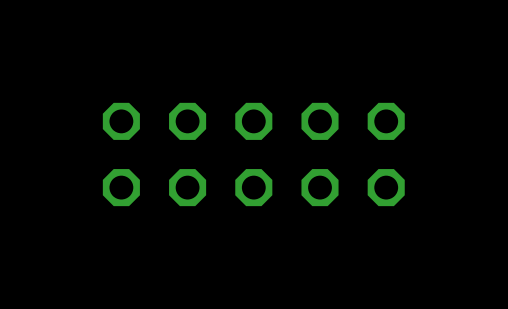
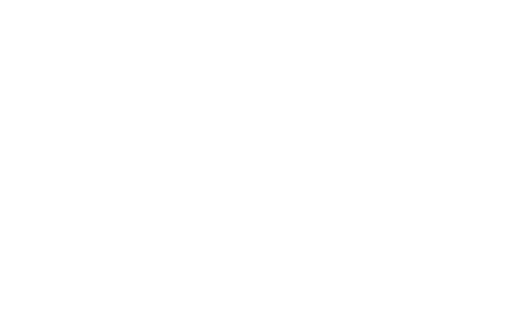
part: (253, 154) -> none

